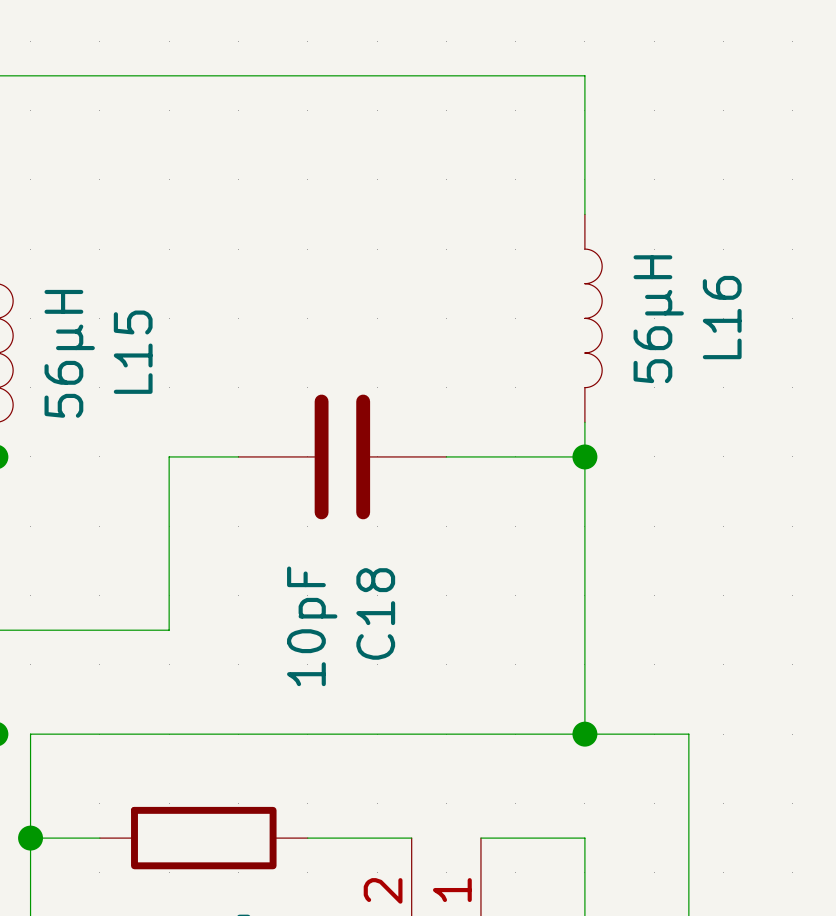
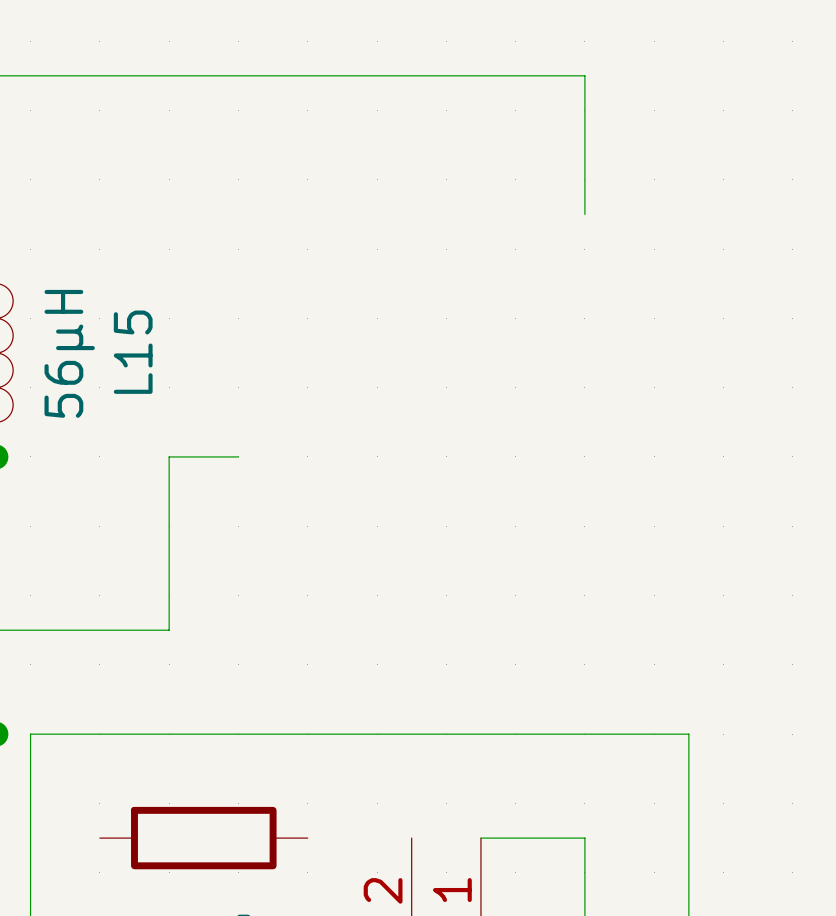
L16: 56μH (593, 318) -> none
wire: (584, 422) (584, 734) -> none
C18: 10pF (342, 456) -> none
wire: (446, 456) (584, 456) -> none
junction: (584, 456) -> none
junction: (584, 734) -> none
wire: (30, 838) (99, 838) -> none
junction: (30, 838) -> none
wire: (307, 838) (411, 838) -> none

